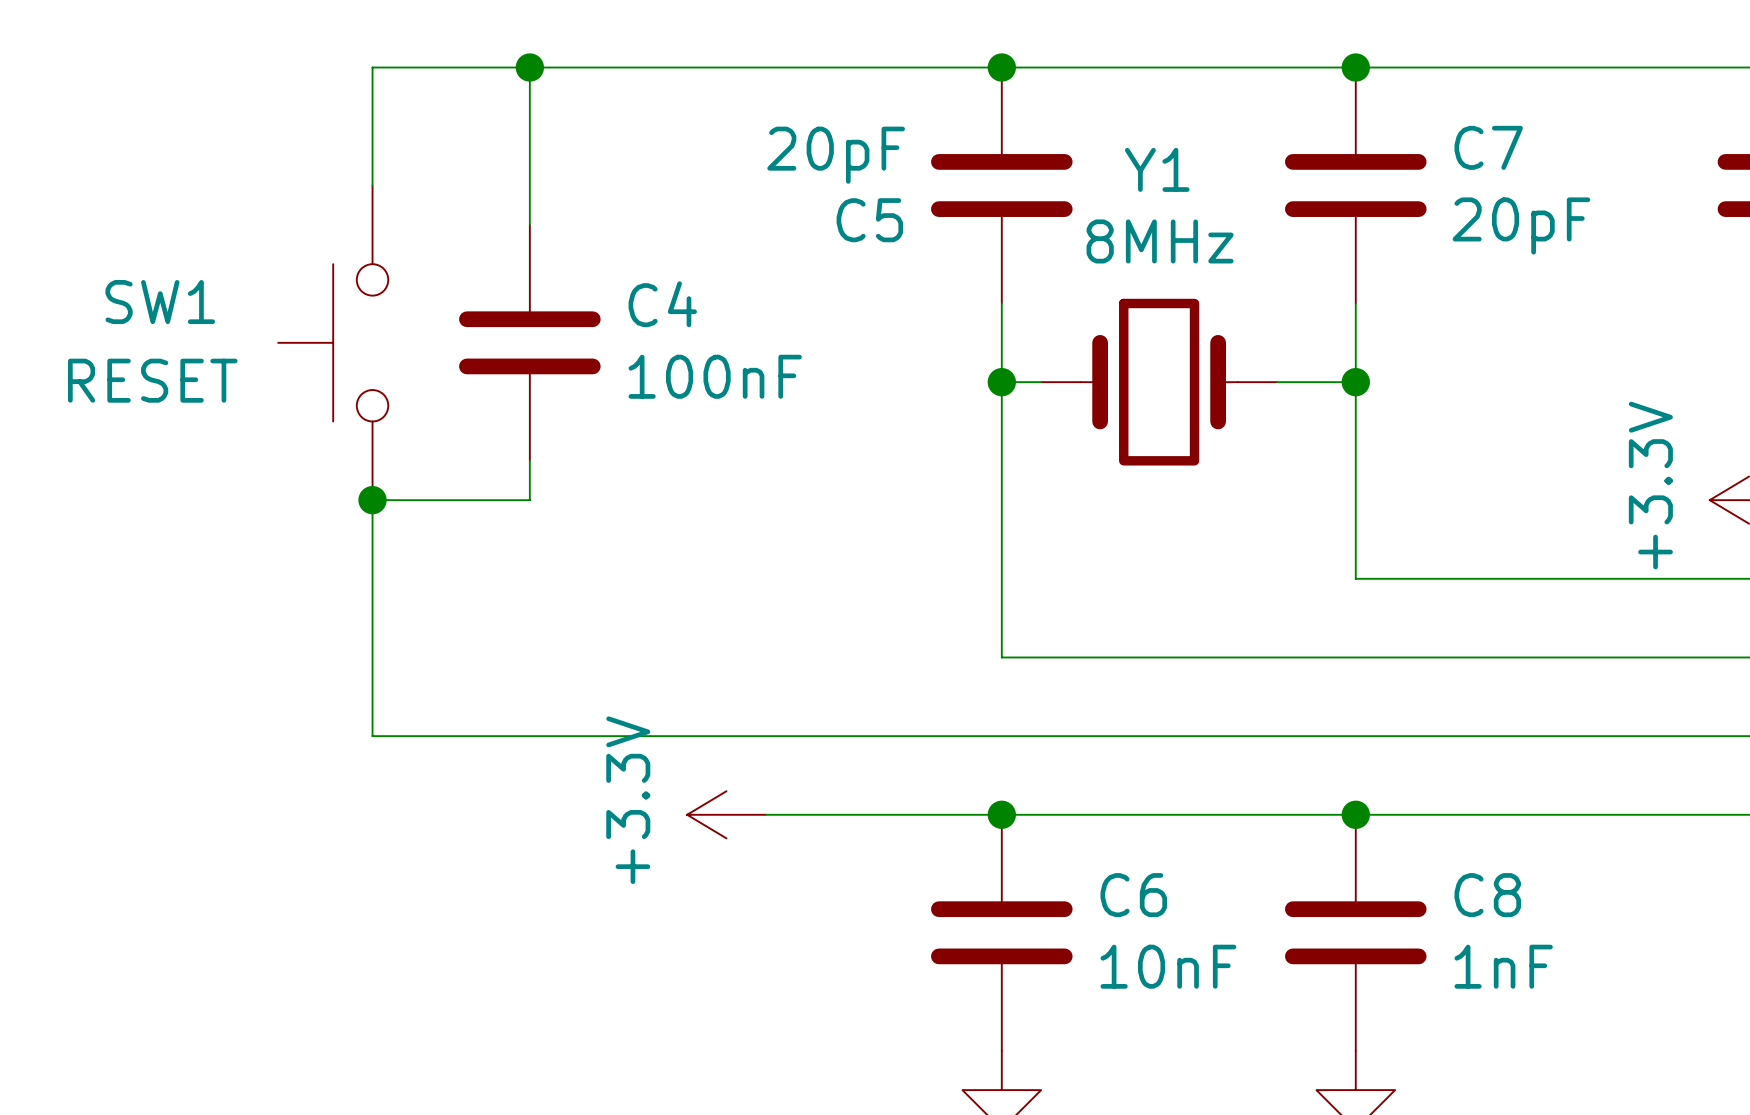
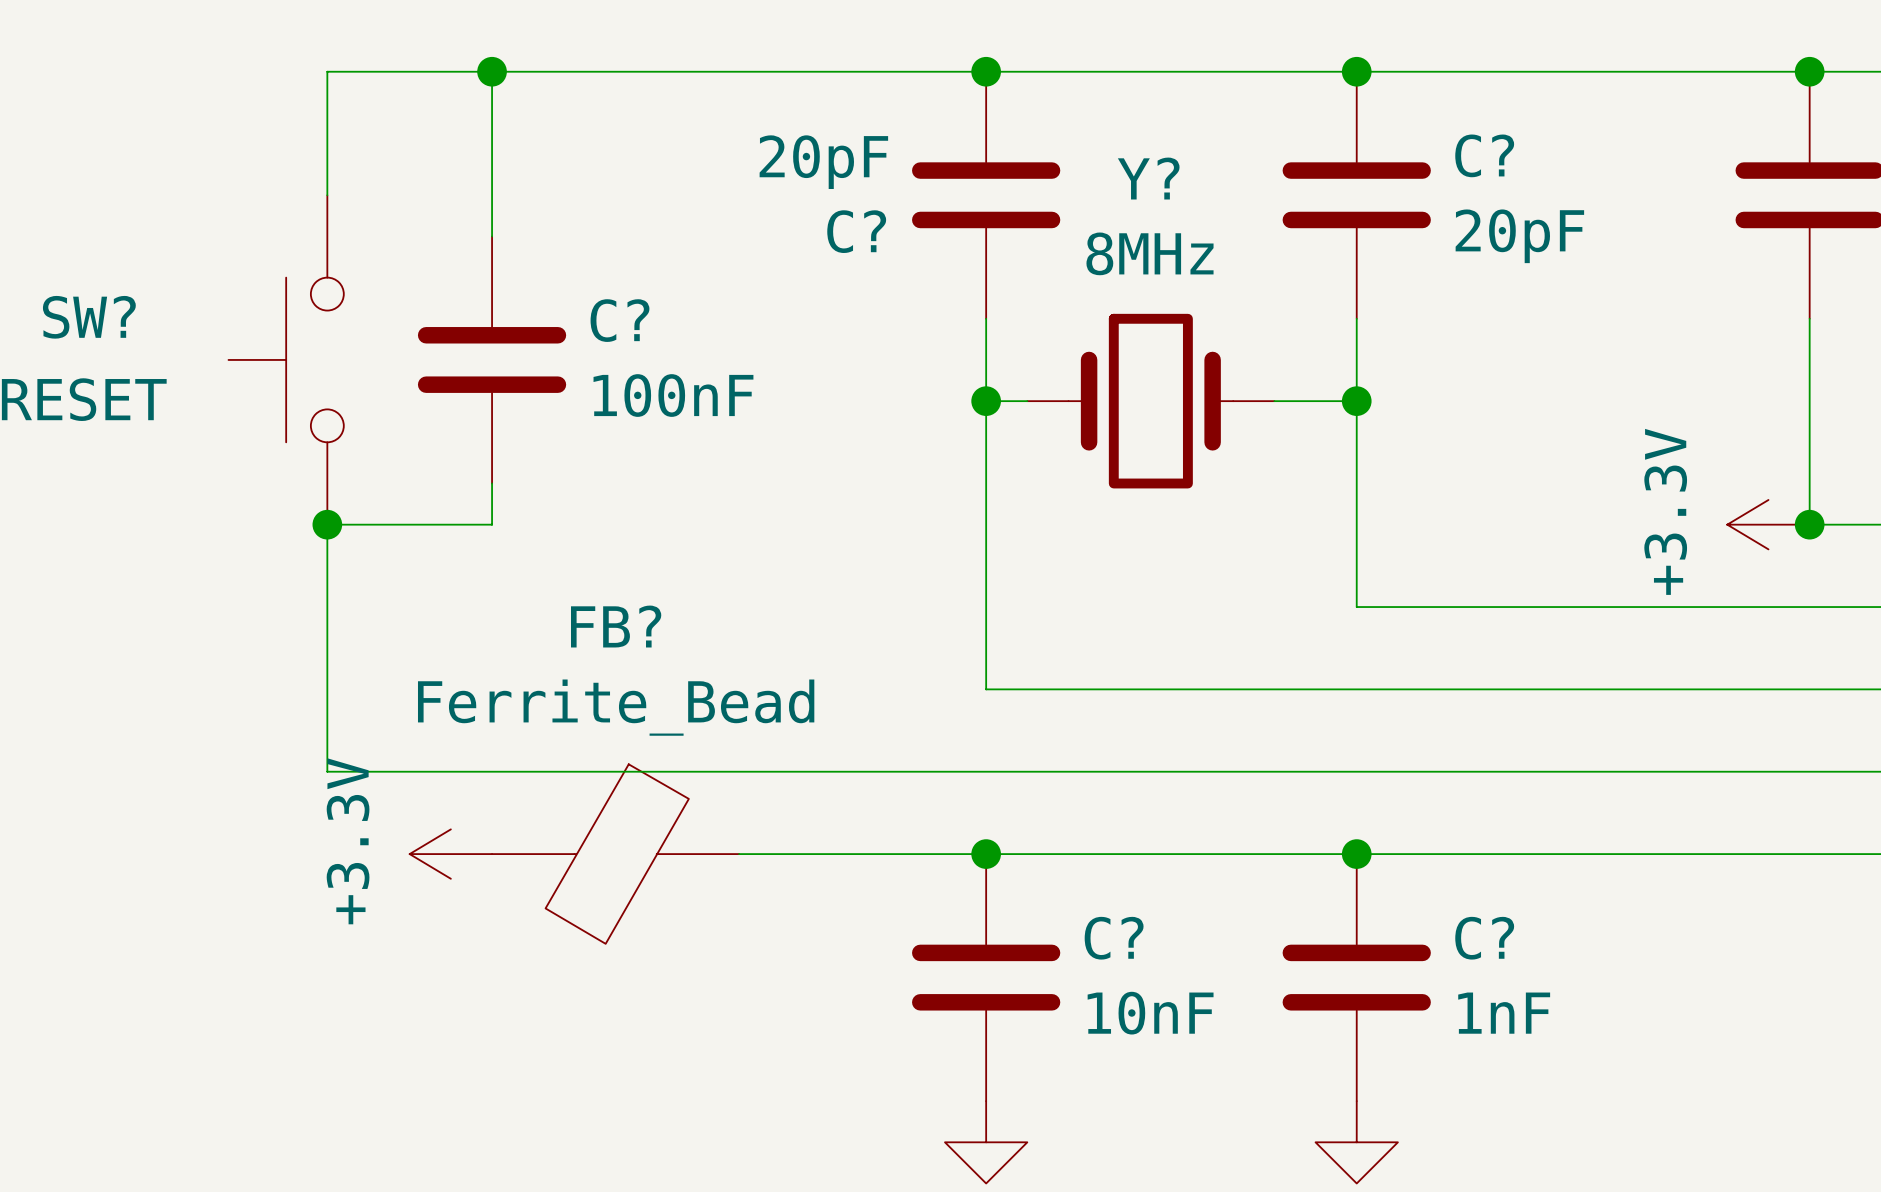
C7 name: C7 (1488, 147) -> C? (1484, 155)
Y1 name: Y1 (1157, 169) -> Y? (1148, 178)
C5 name: C5 (869, 220) -> C? (856, 231)
SW1 name: SW1 (160, 302) -> SW? (89, 317)
C4 name: C4 (662, 304) -> C? (620, 320)
FB?: none -> Ferrite_Bead (615, 854)
power symbol position: +3.3V (726, 814) -> +3.3V (450, 854)
C6 name: C6 (1133, 895) -> C? (1114, 938)
C8 name: C8 (1487, 895) -> C? (1484, 938)

